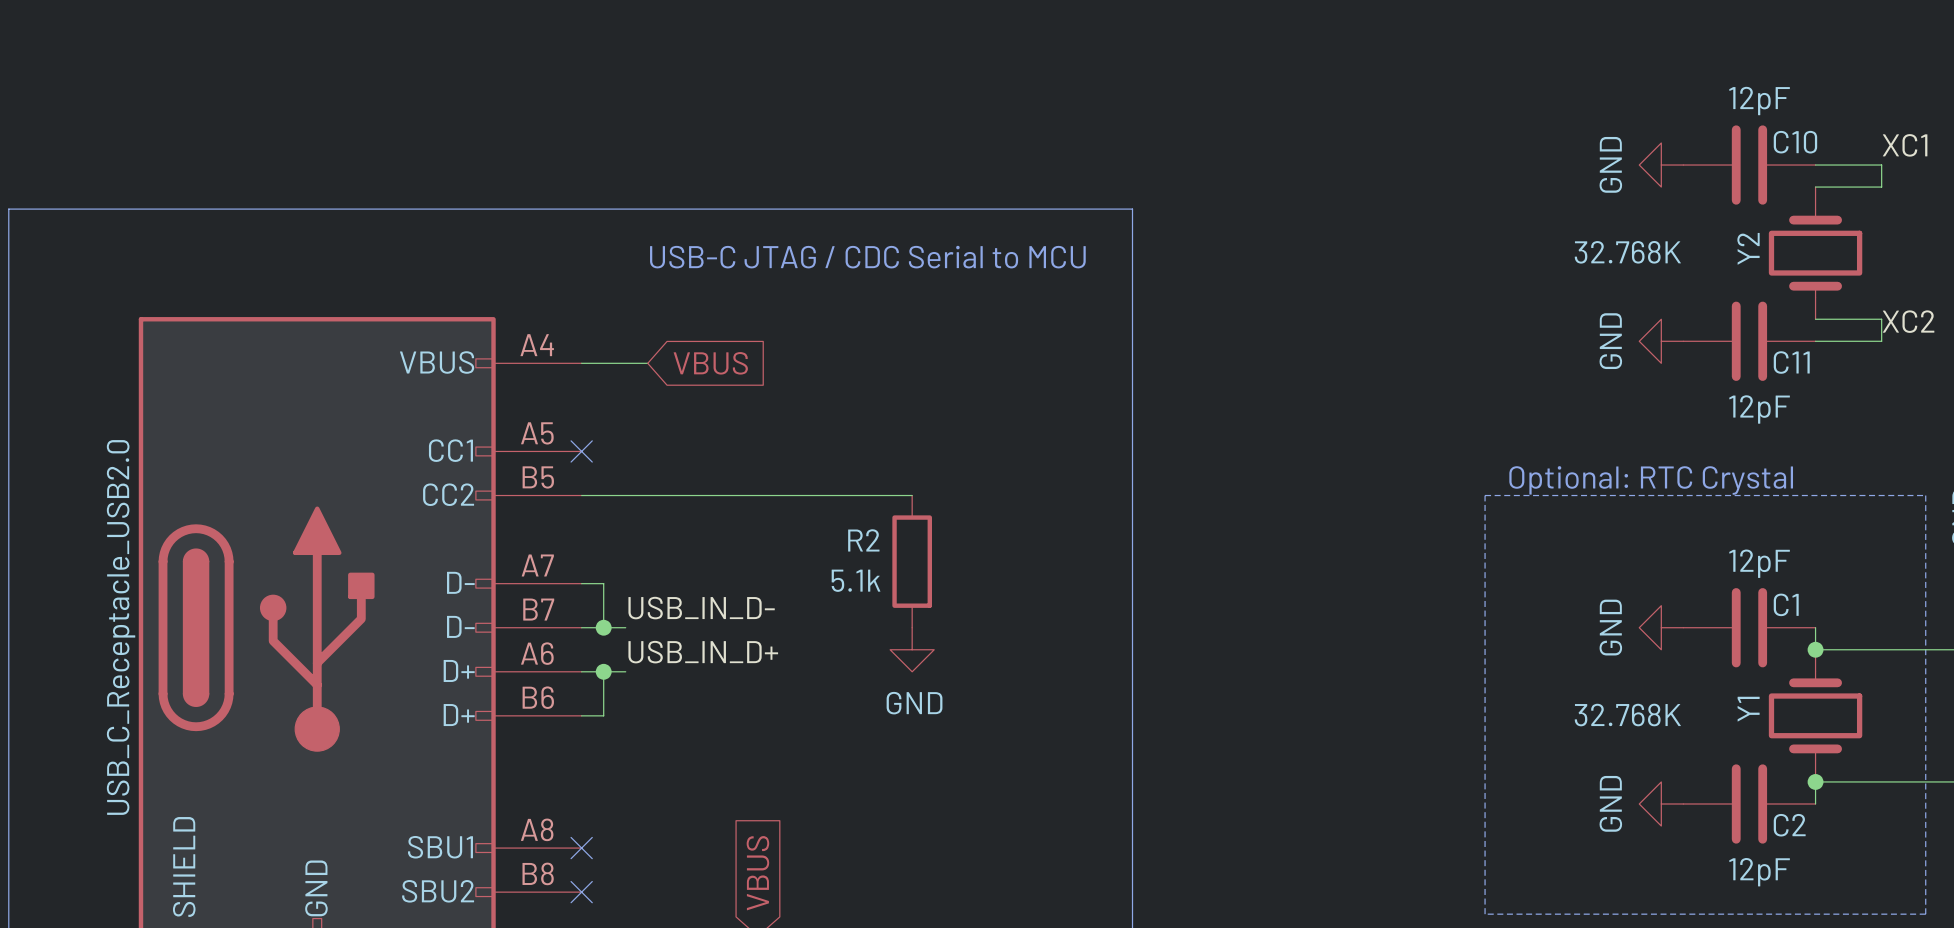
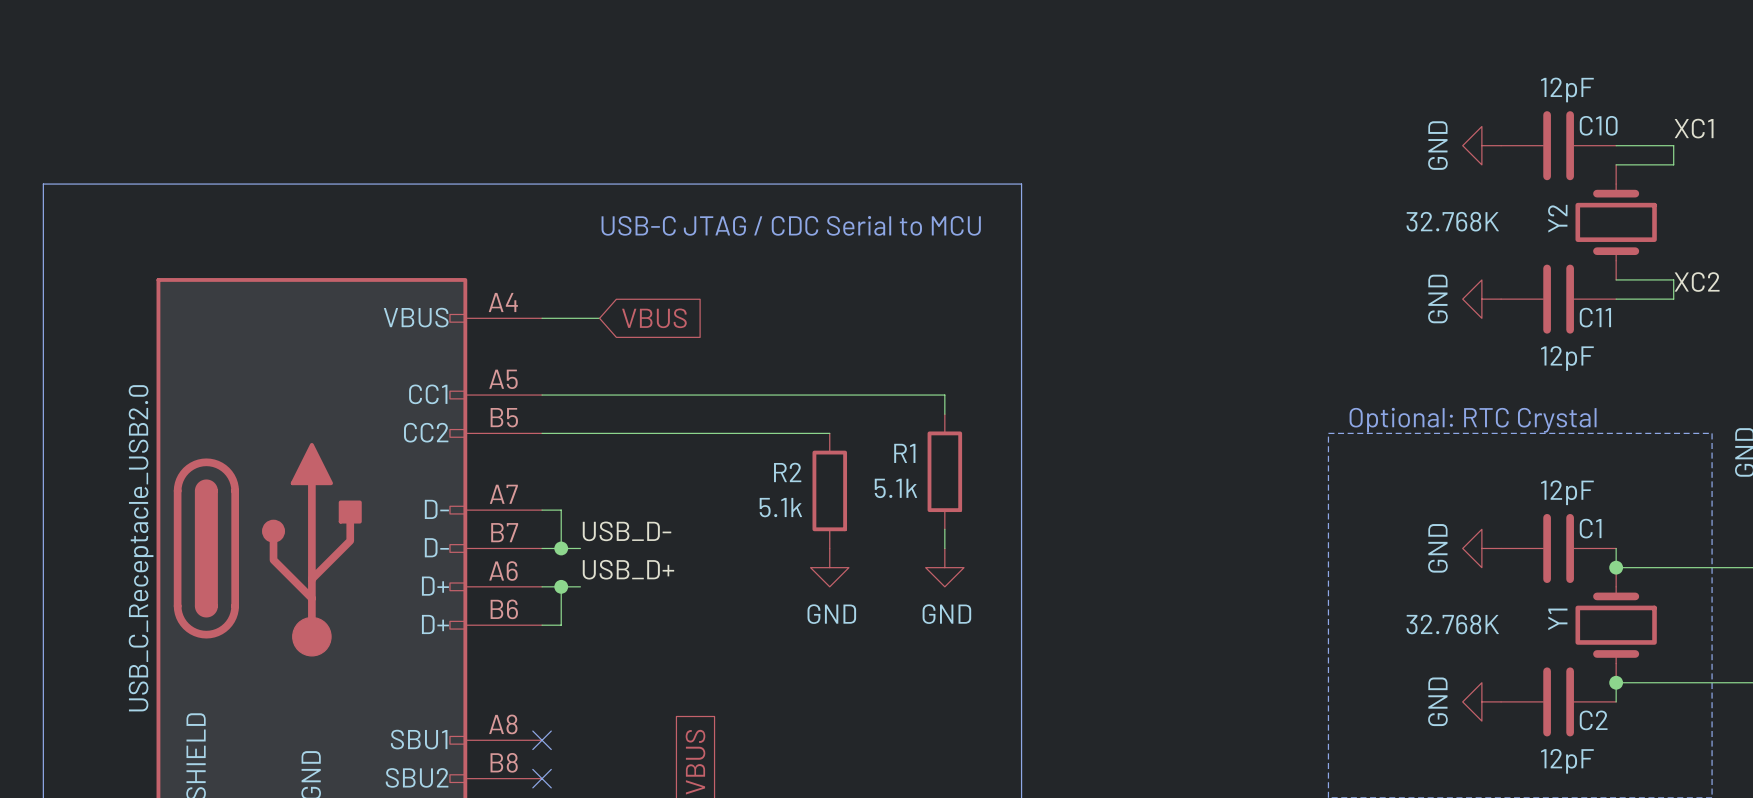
wire: none -> (542, 395) (944, 395) (944, 414)
no-connect mark: (581, 451) -> none
R1: none -> 5.1k (944, 471)
wire: none -> (944, 529) (944, 548)
label: USB_IN_D- (701, 608) -> USB_D- (627, 531)
power symbol: none -> GND (944, 567)
label: USB_IN_D+ (703, 652) -> USB_D+ (628, 569)

